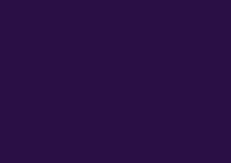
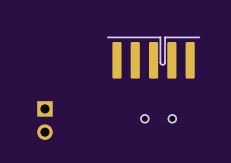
part: none -> (153, 57)
part: none -> (158, 118)
part: none -> (44, 120)

